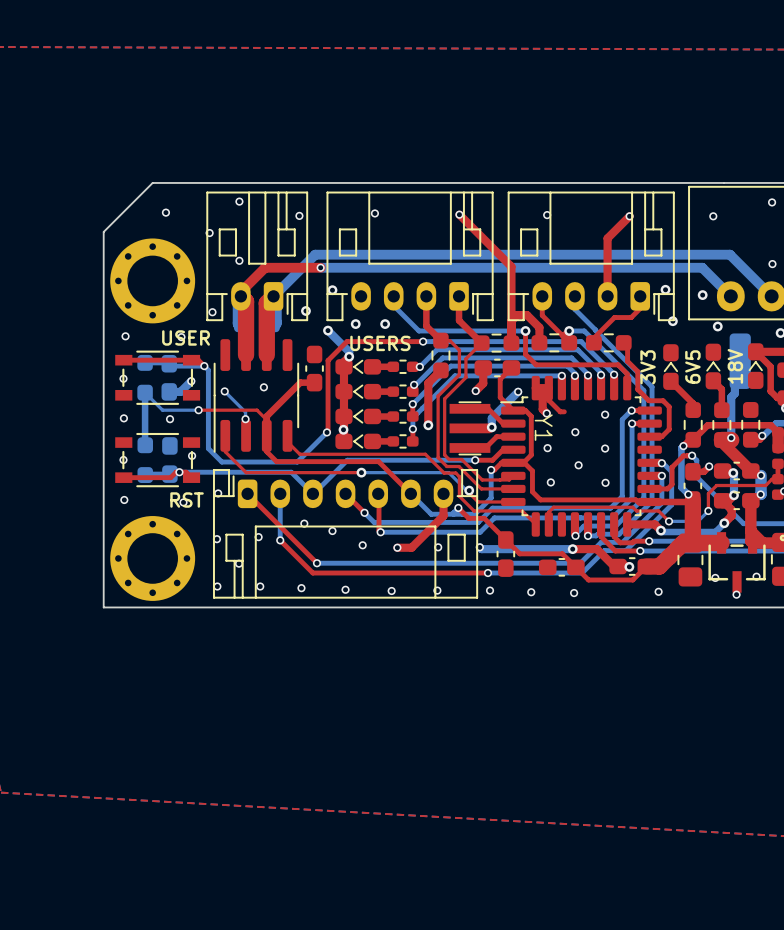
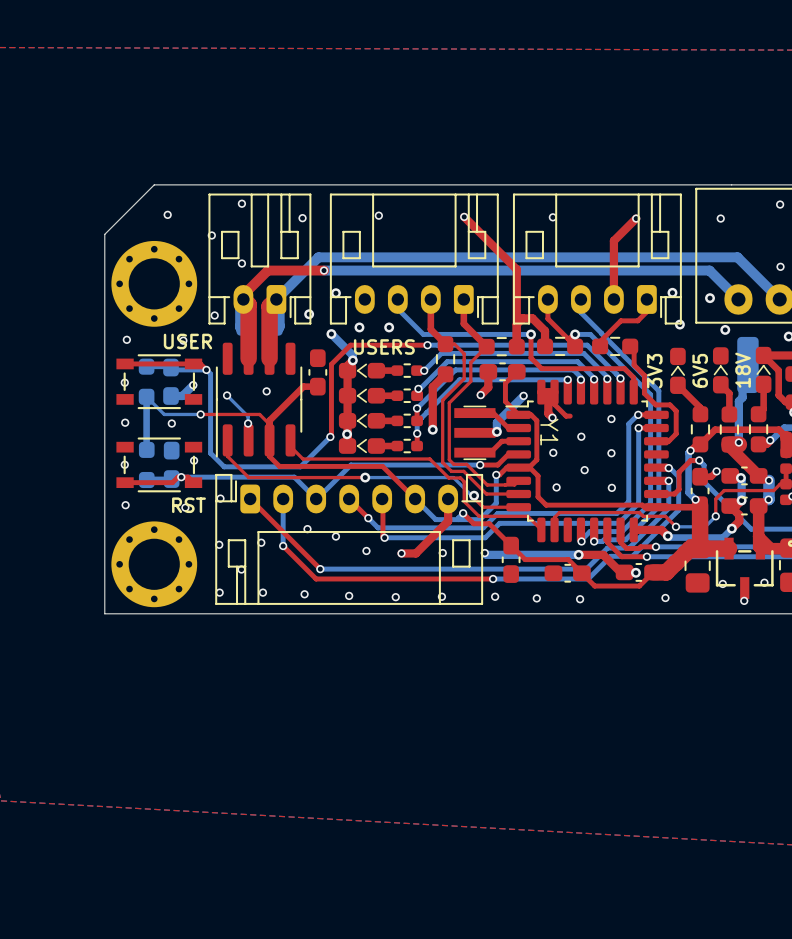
top track: none -> (763, 384) (763, 409) (758, 414)

